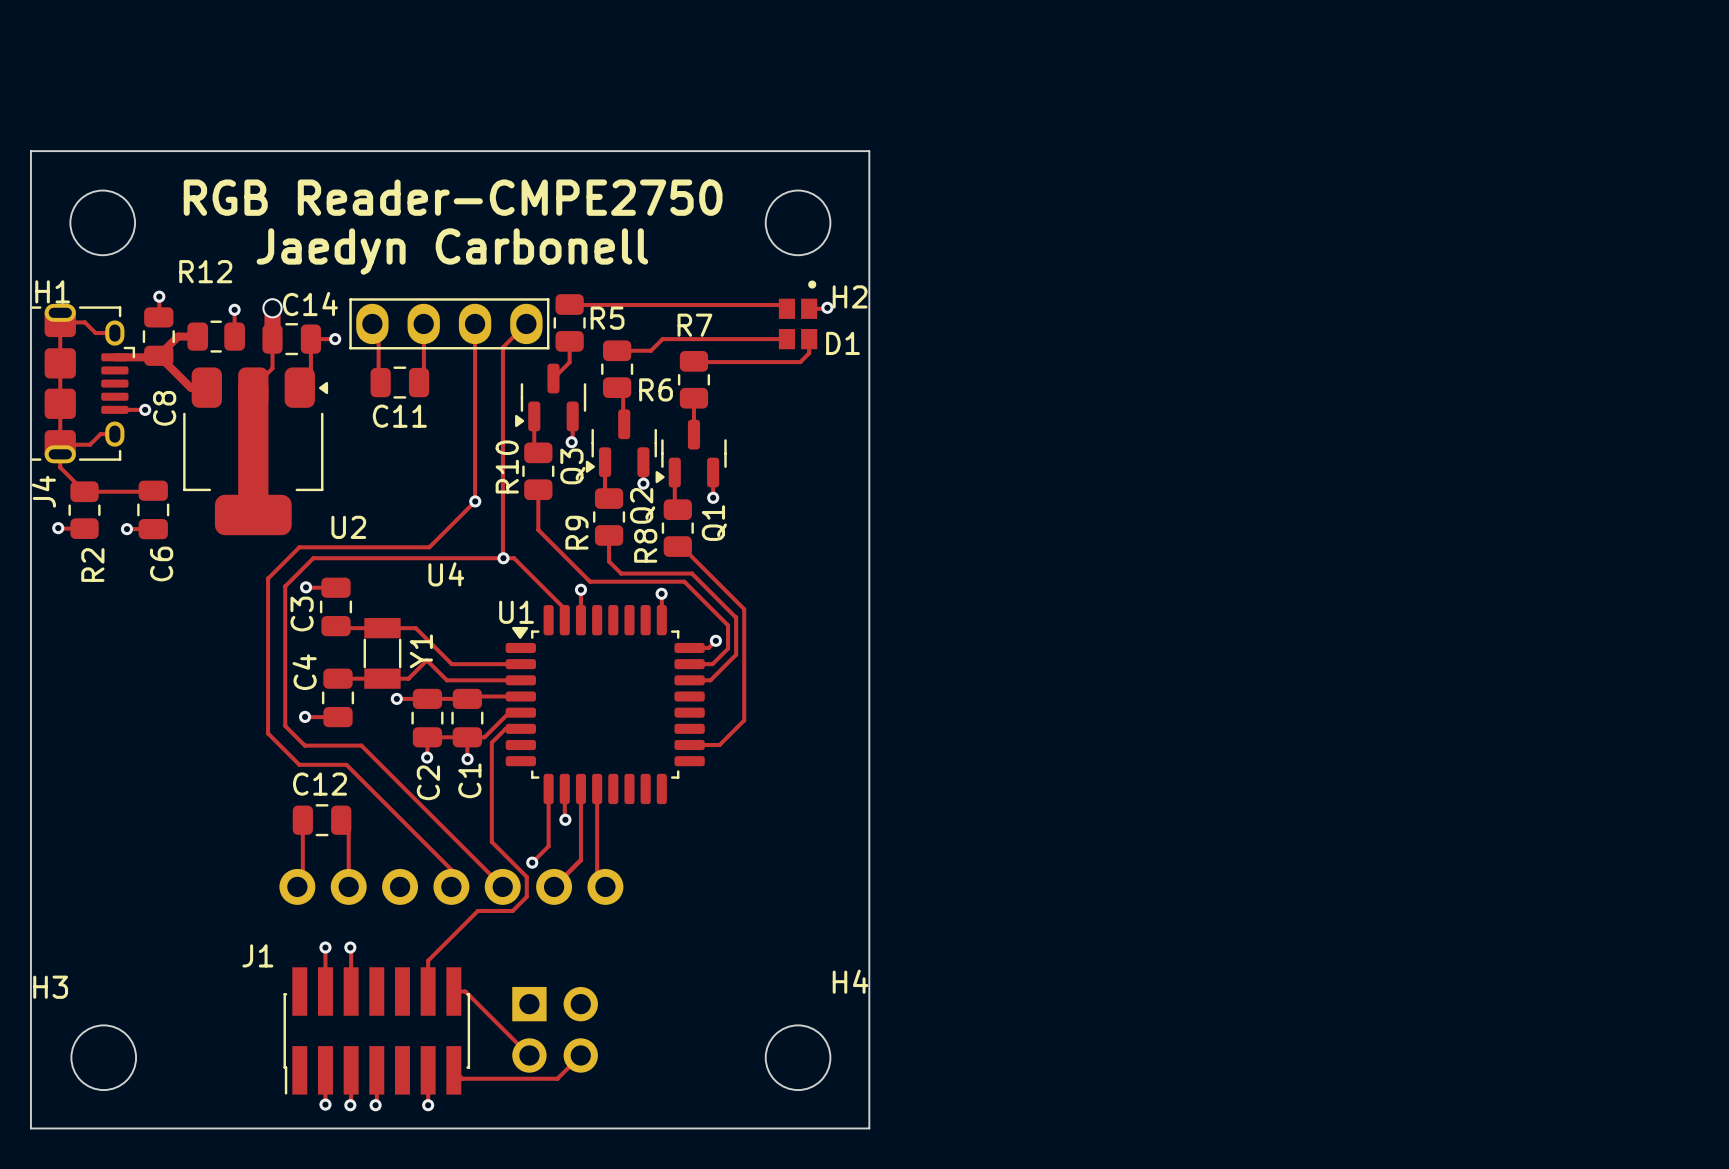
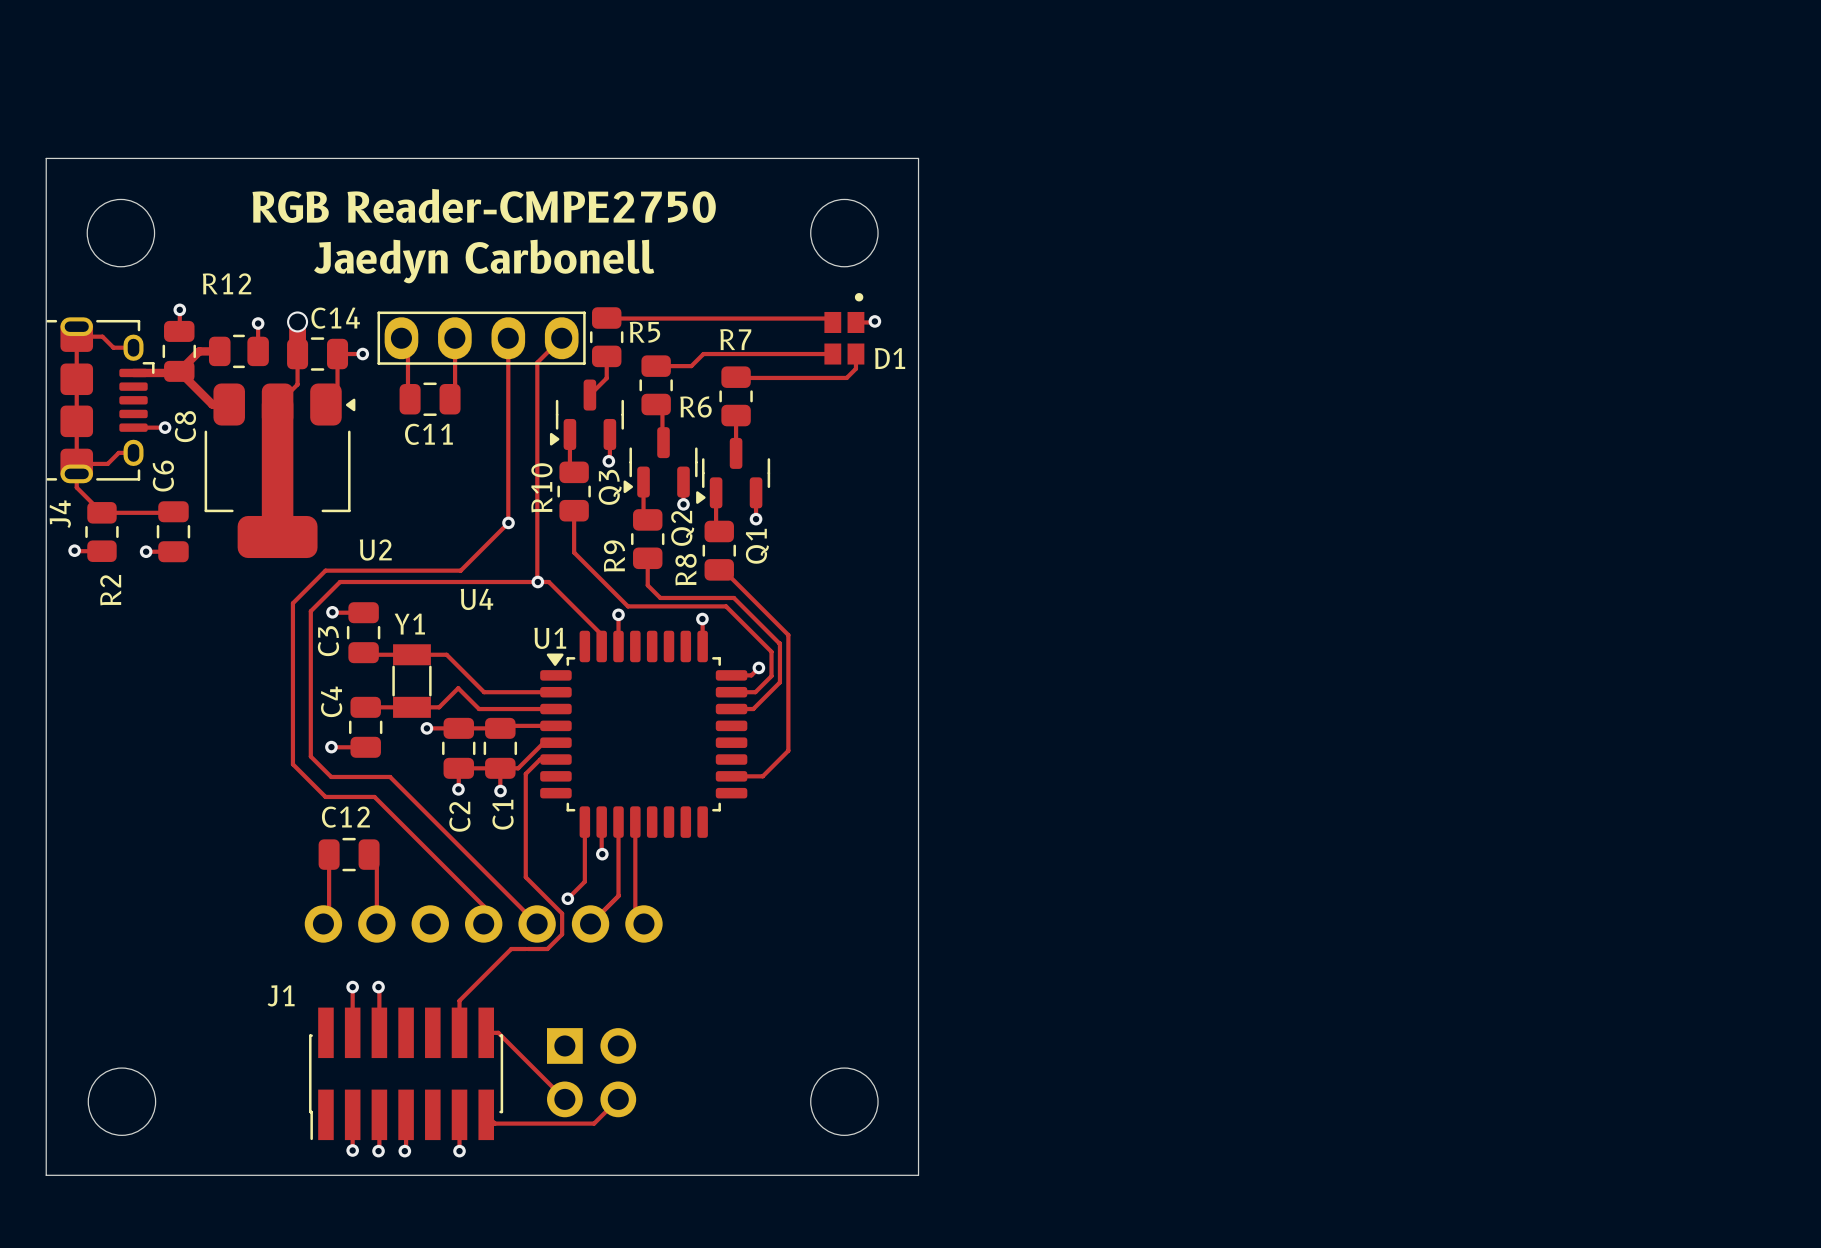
H1 name: H1 (52, 291) -> none
H2 name: H2 (850, 296) -> none
C6 name position: C6 (161, 563) -> C6 (163, 476)
Y1 name rotation: 0° (421, 651) -> 90° clockwise (409, 624)
Y1 name position: Y1 (421, 651) -> Y1 (409, 624)
H4 name: H4 (850, 981) -> none
H3 name: H3 (50, 987) -> none

